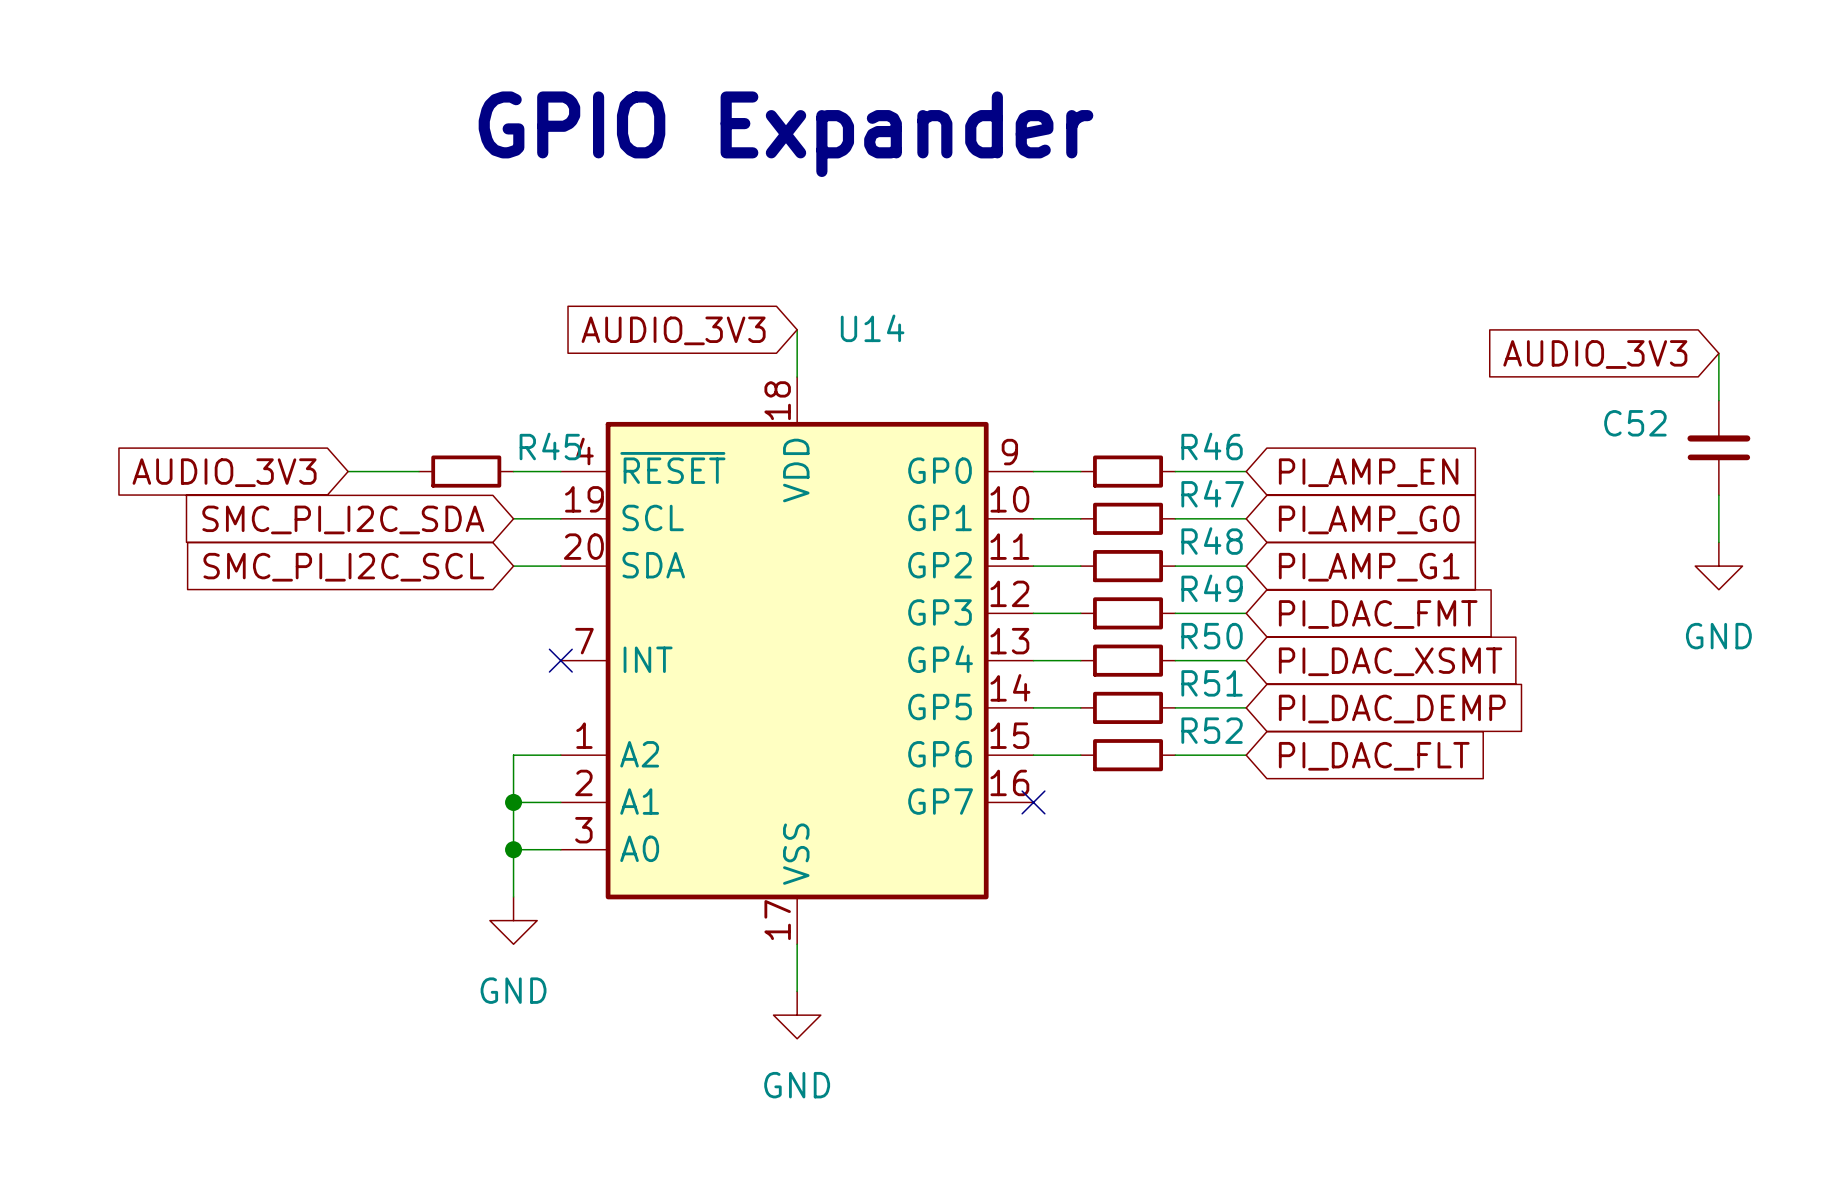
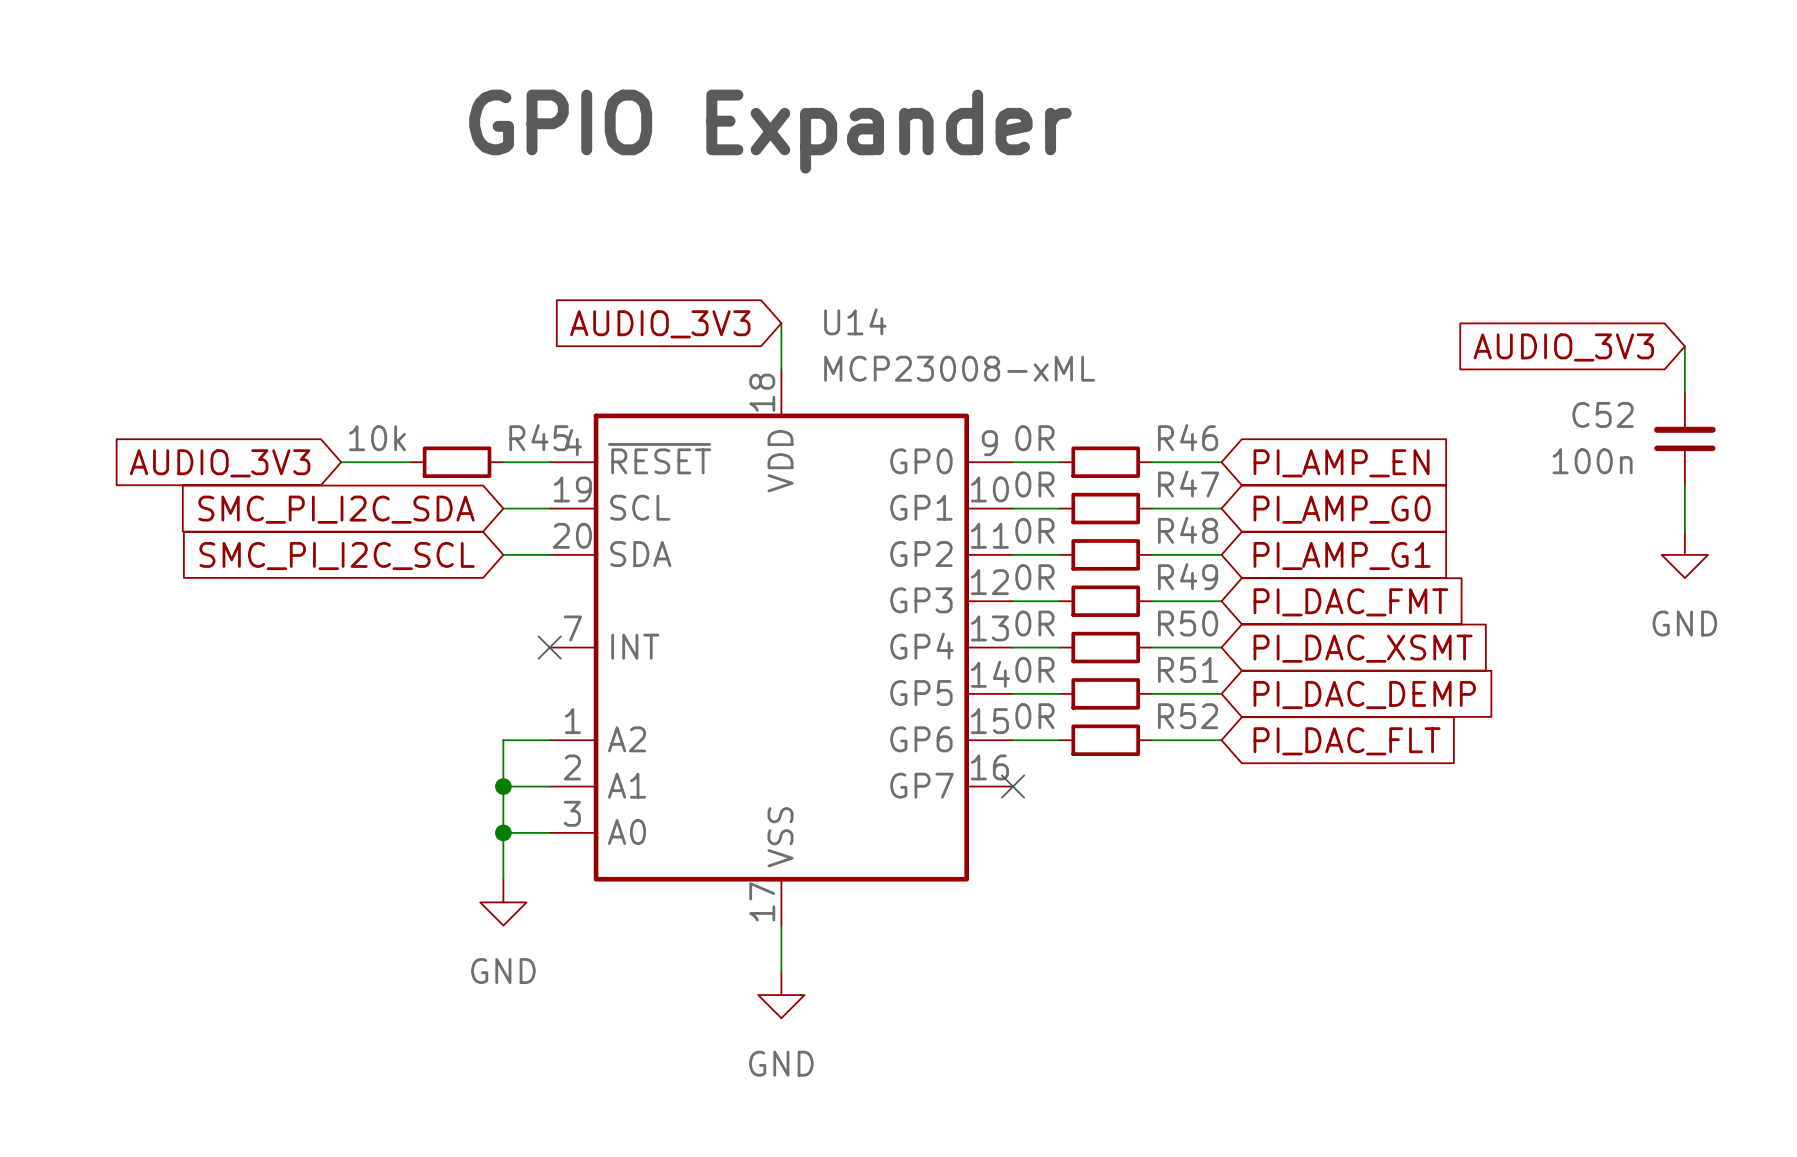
U14 value: none -> MCP23008-xML (959, 368)
R45 value: none -> 10k (377, 438)
R46 value: none -> 0R (1034, 438)
C52 value: none -> 100n (1592, 461)
R47 value: none -> 0R (1034, 484)
R48 value: none -> 0R (1034, 530)
R49 value: none -> 0R (1034, 577)
R50 value: none -> 0R (1034, 623)
R51 value: none -> 0R (1034, 669)
R52 value: none -> 0R (1034, 716)

